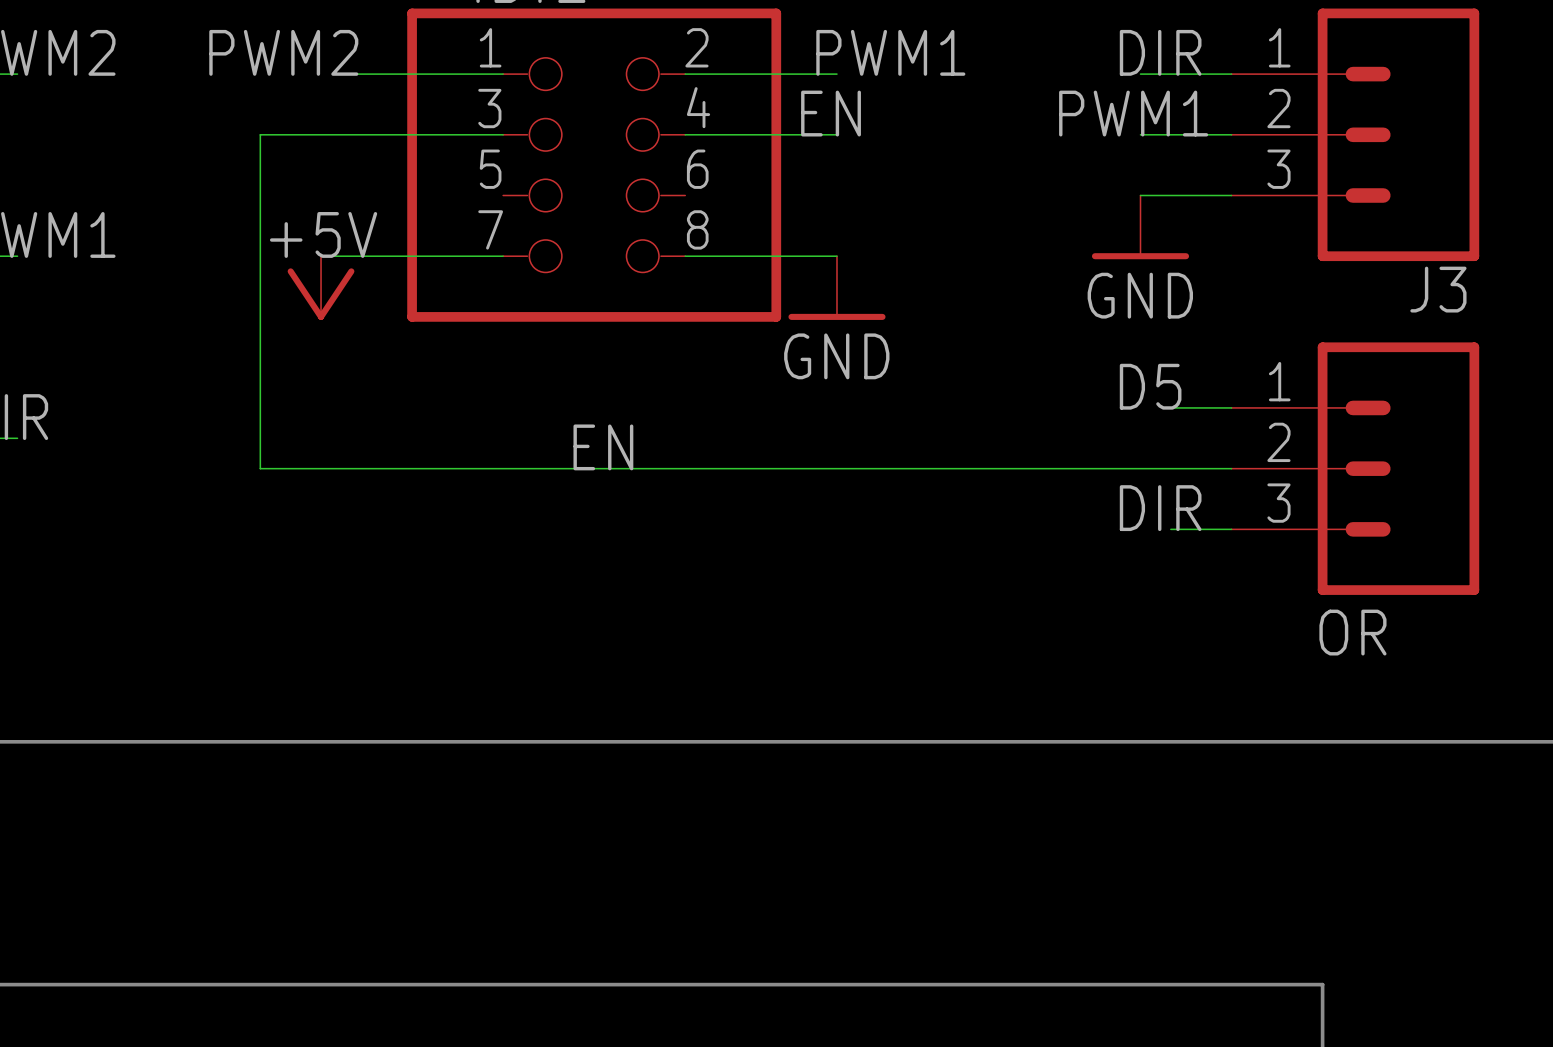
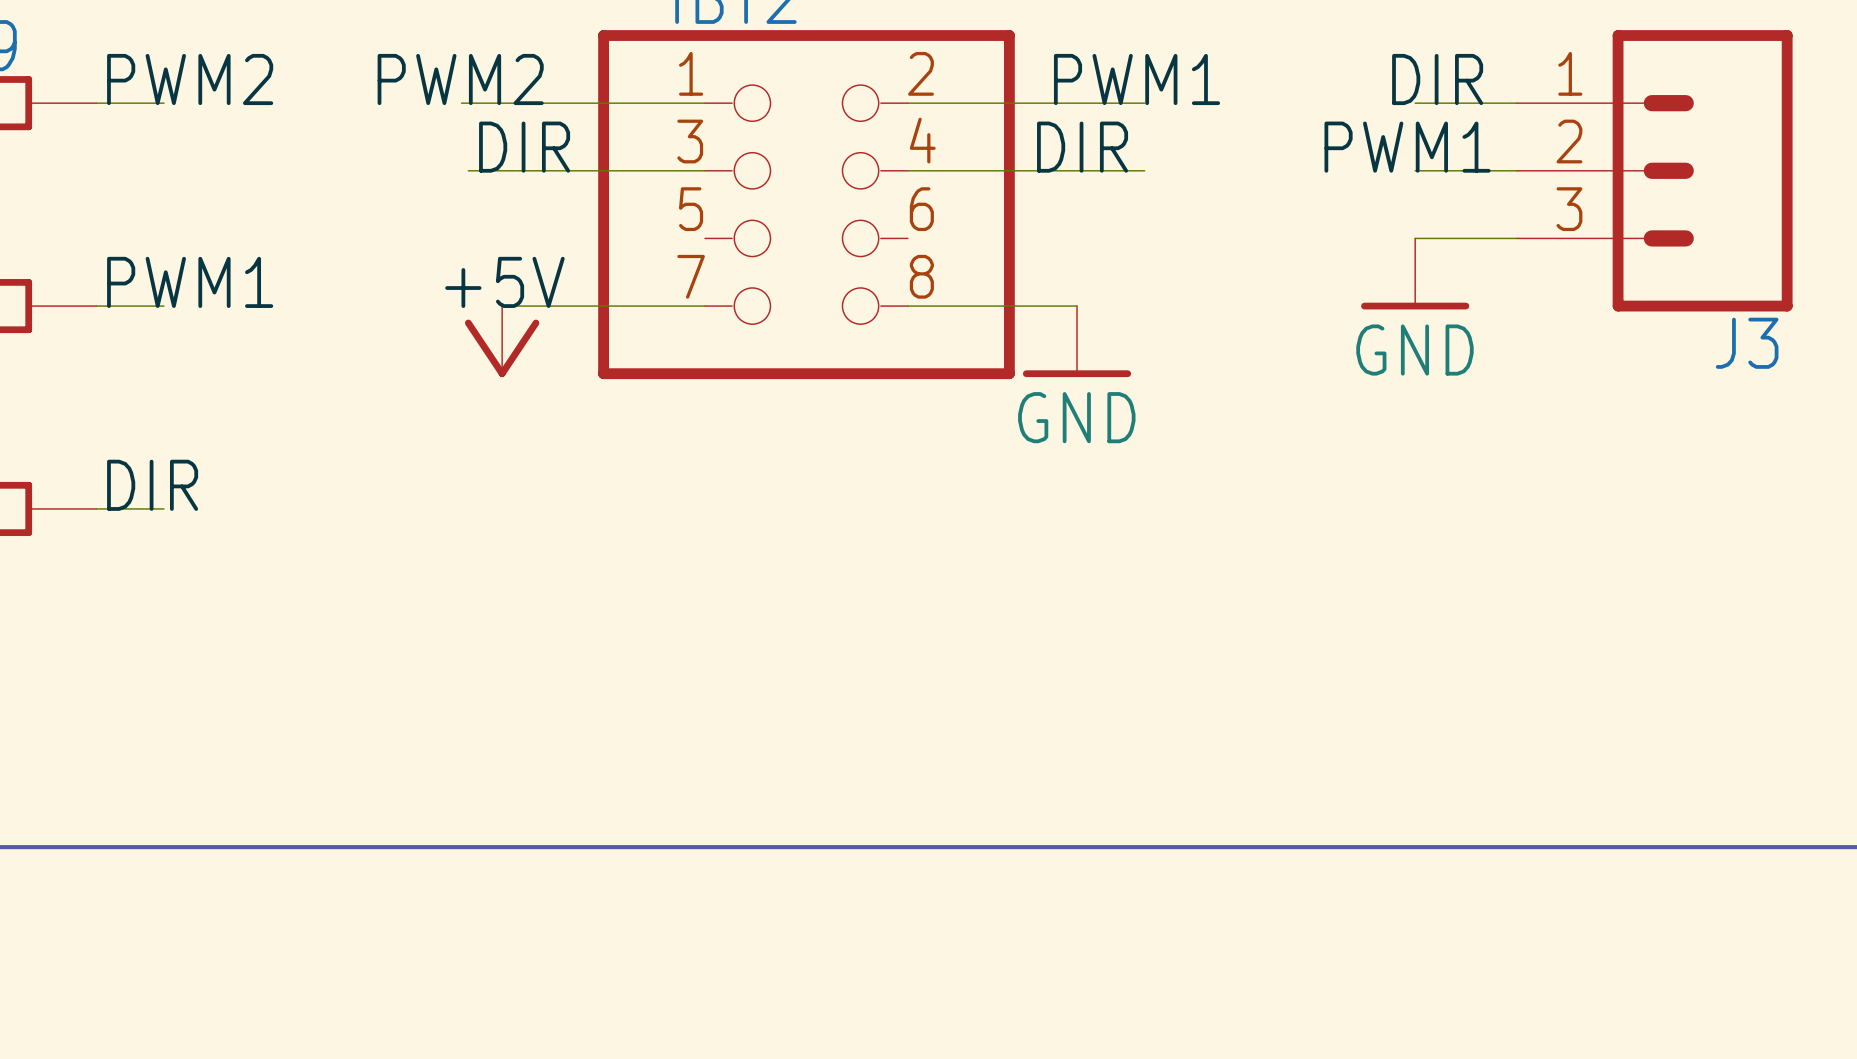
wire: none -> (461, 103) (535, 103)
label: none -> DIR (524, 147)
label: EN (831, 113) -> DIR (1082, 147)
wire: (290, 134) (260, 134) (260, 468) (1231, 468) -> none
label: D5 (1150, 386) -> none
wire: (1170, 407) (1231, 407) -> (1077, 170) (1144, 170)
label: EN (603, 447) -> none
OR: (1355, 468) -> none
label: DIR (1160, 508) -> none
wire: (1170, 529) (1231, 529) -> (1077, 103) (1144, 103)

